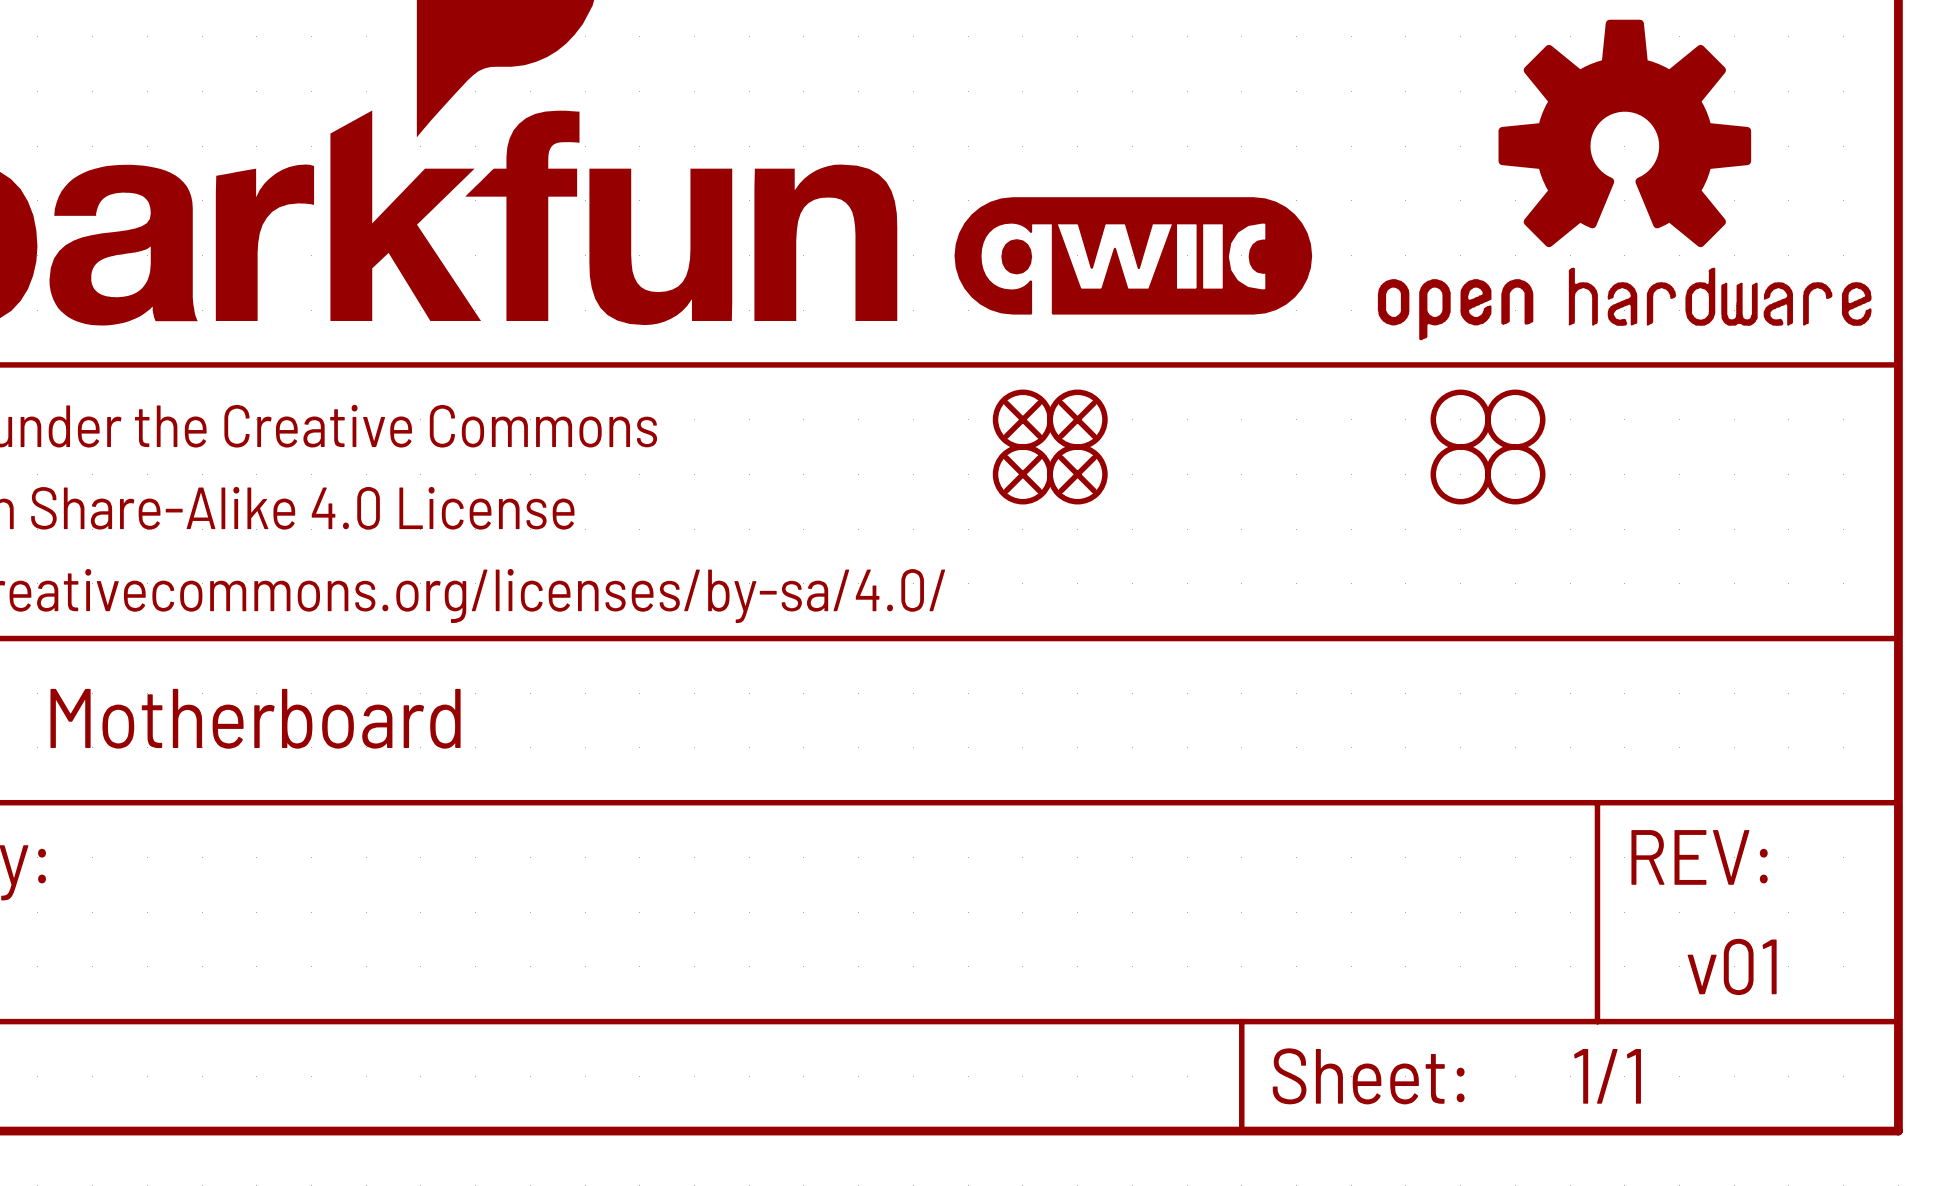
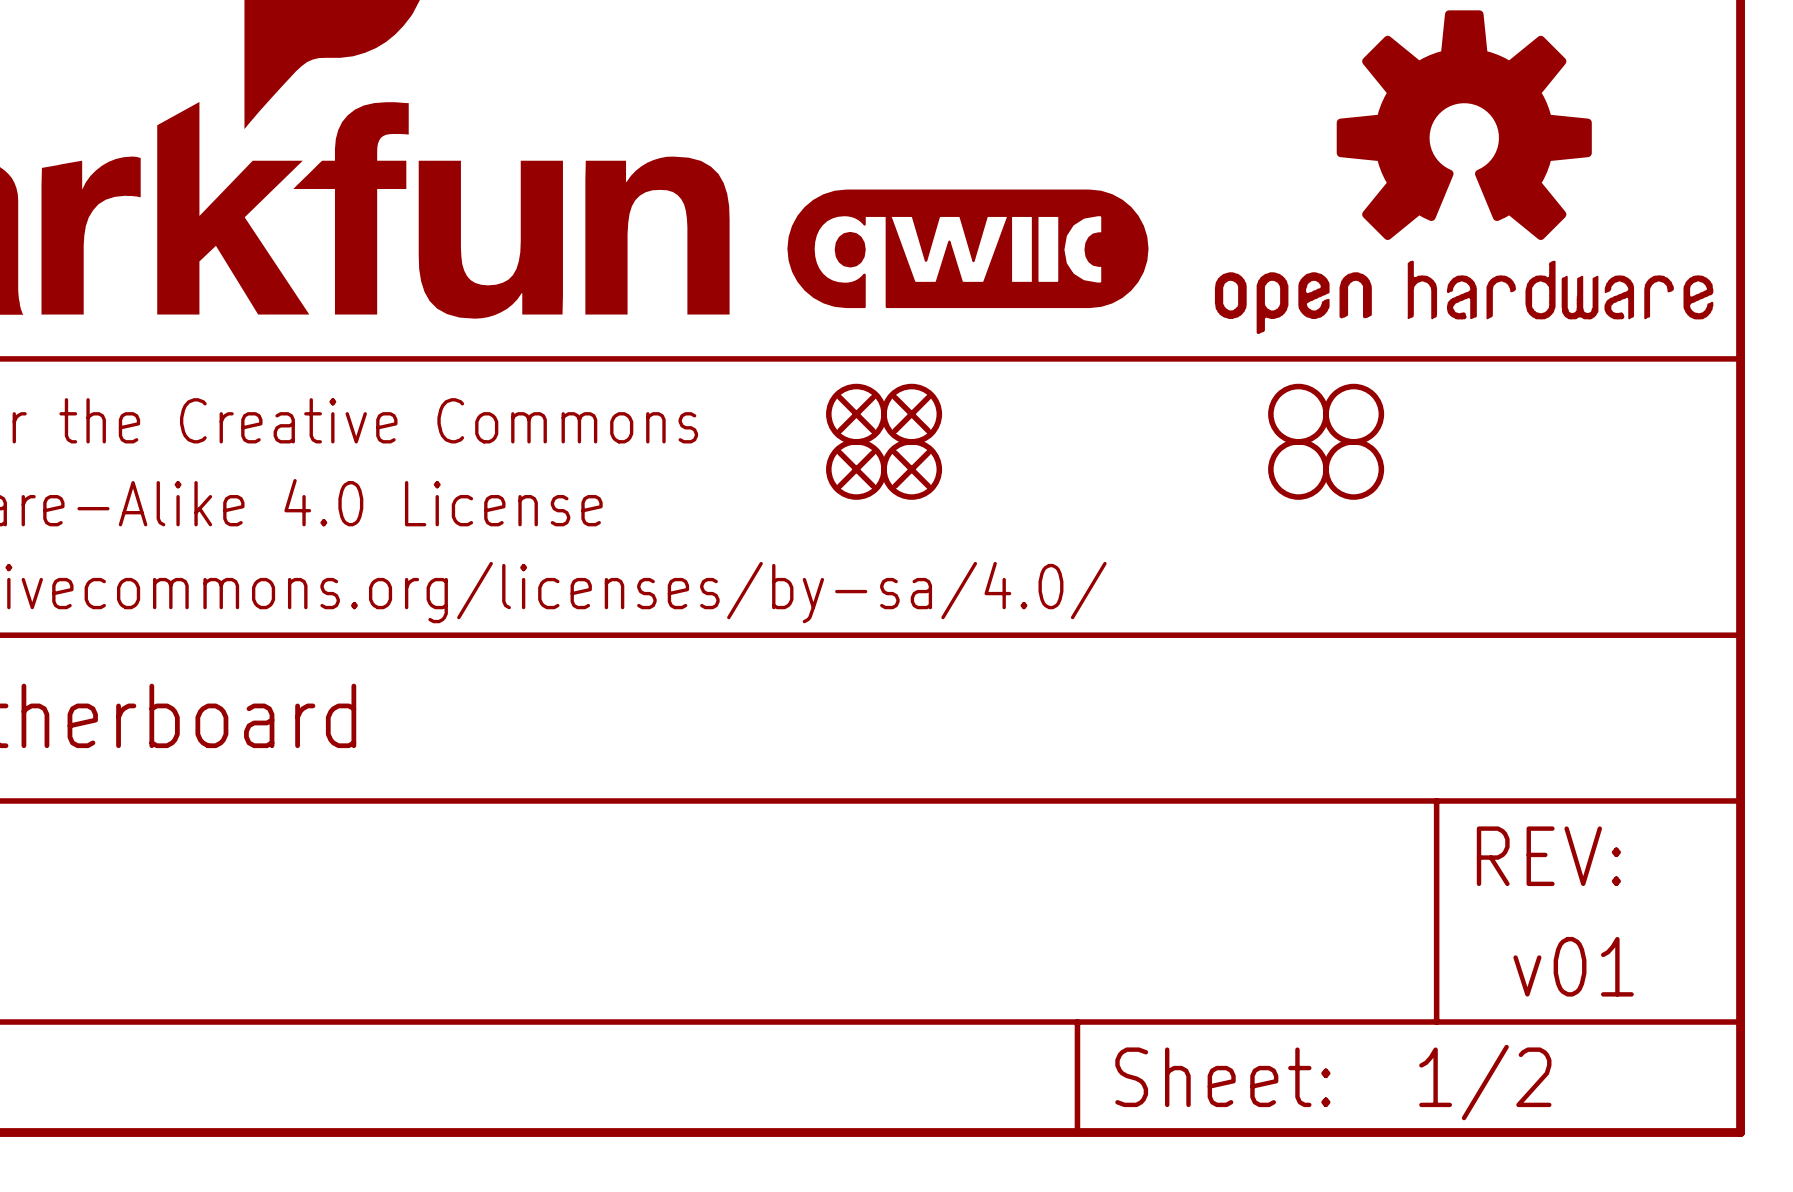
part text: 1/1 (1607, 1076) -> 1/2 (1485, 1082)

